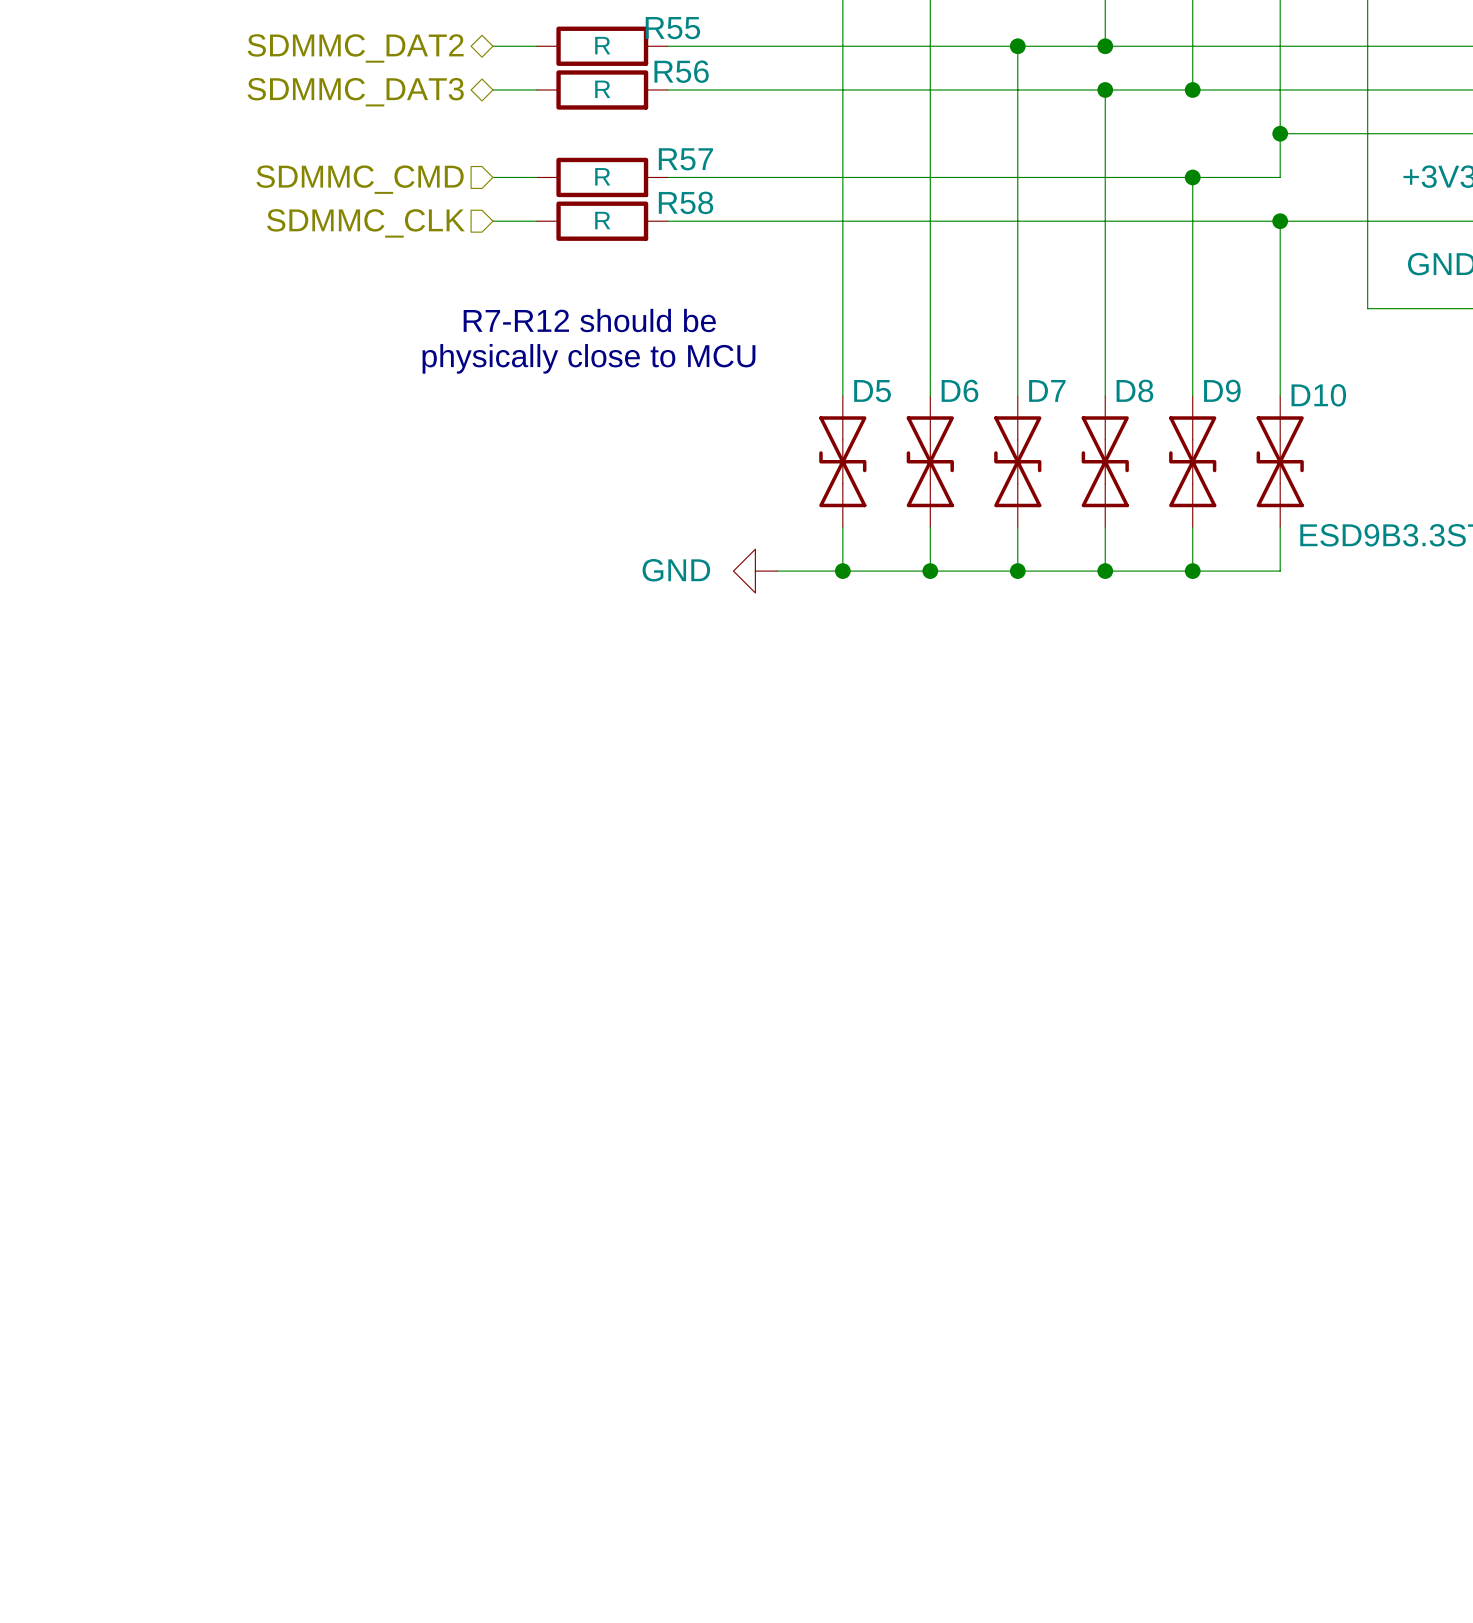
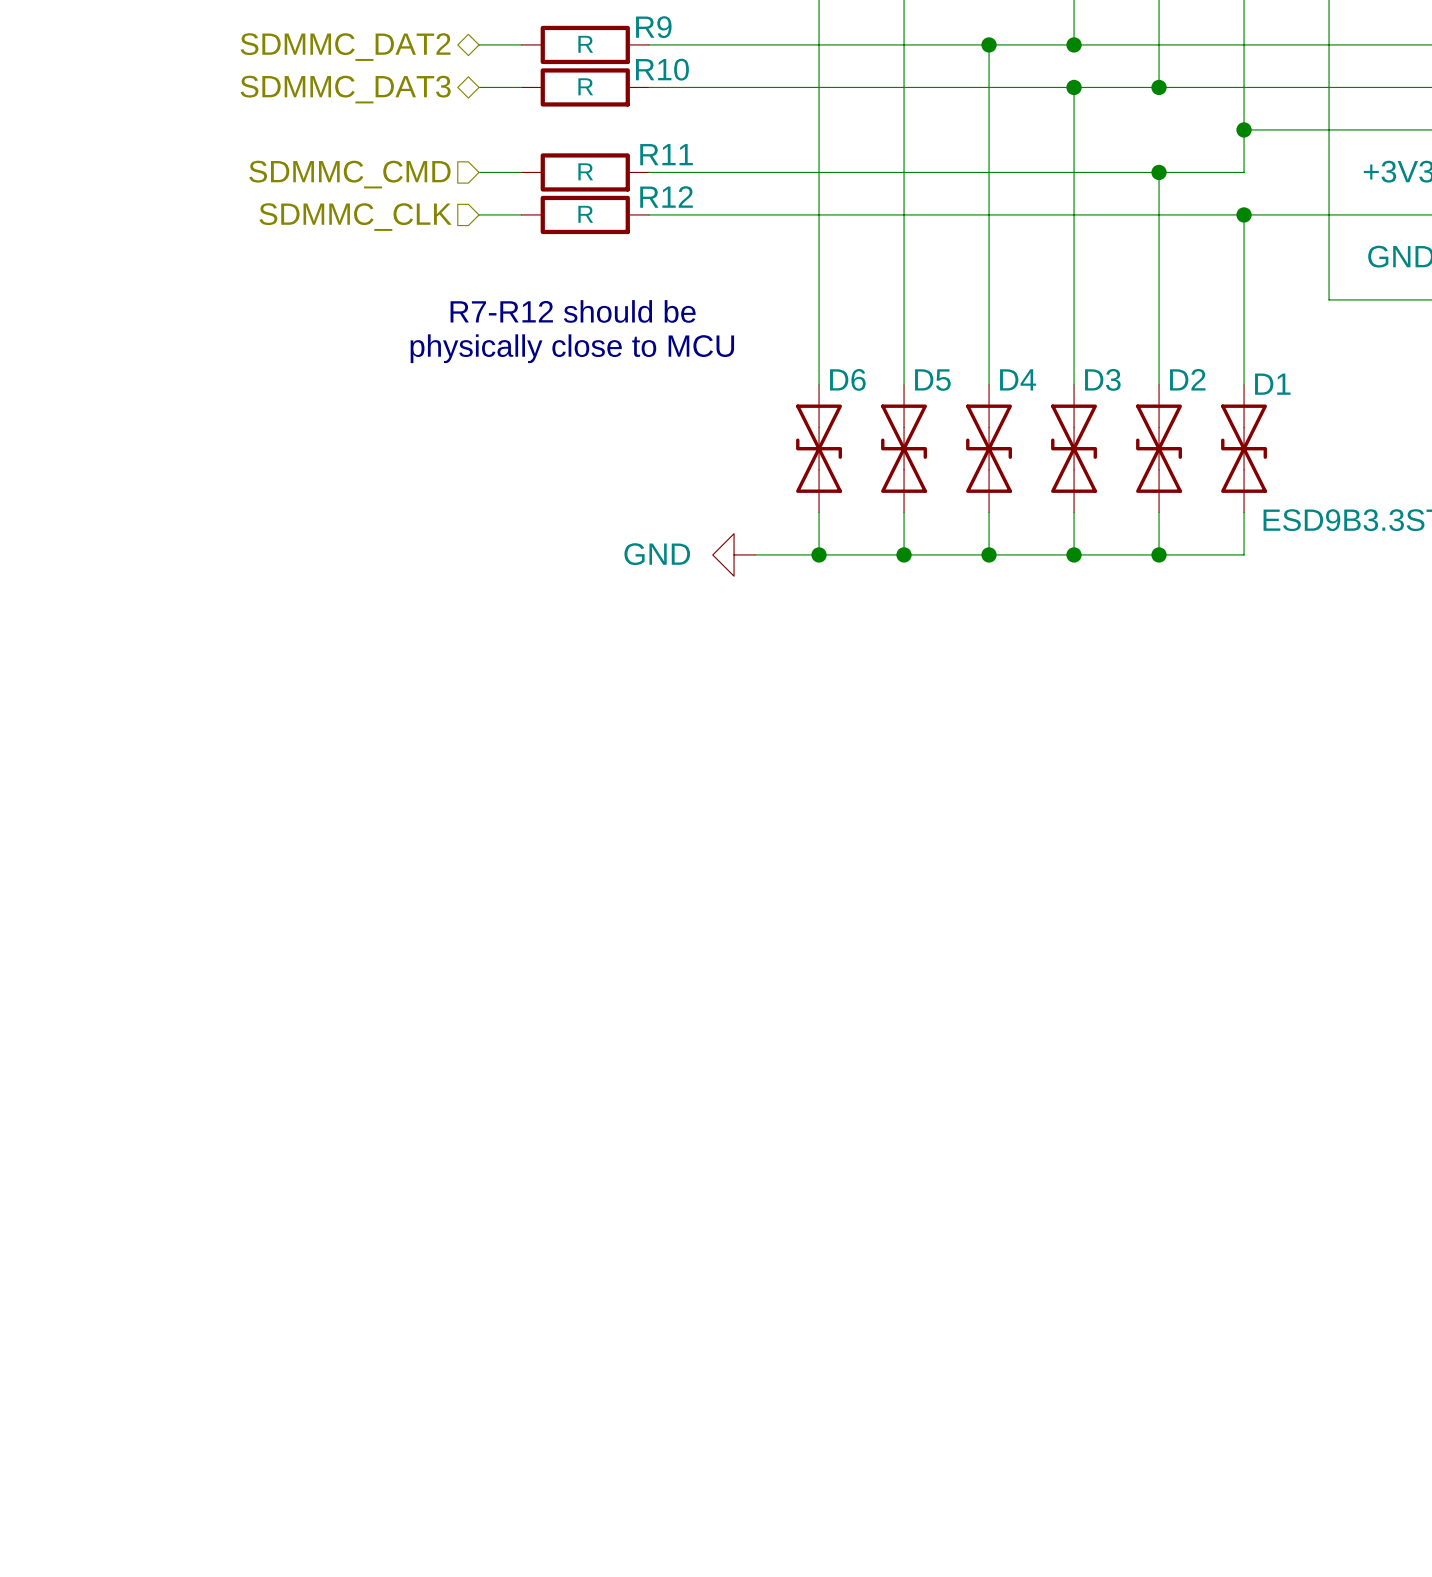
R55 name: R55 (672, 28) -> R9 (653, 27)
R56 name: R56 (681, 71) -> R10 (662, 69)
R57 name: R57 (685, 159) -> R11 (666, 154)
R58 name: R58 (686, 202) -> R12 (666, 197)
D6 name: D6 (959, 390) -> D5 (932, 380)
D7 name: D7 (1047, 390) -> D4 (1018, 379)
D8 name: D8 (1134, 390) -> D3 (1102, 379)
D9 name: D9 (1222, 390) -> D2 (1187, 379)
D5 name: D5 (872, 391) -> D6 (847, 379)
D10 name: D10 (1318, 395) -> D1 (1272, 384)

